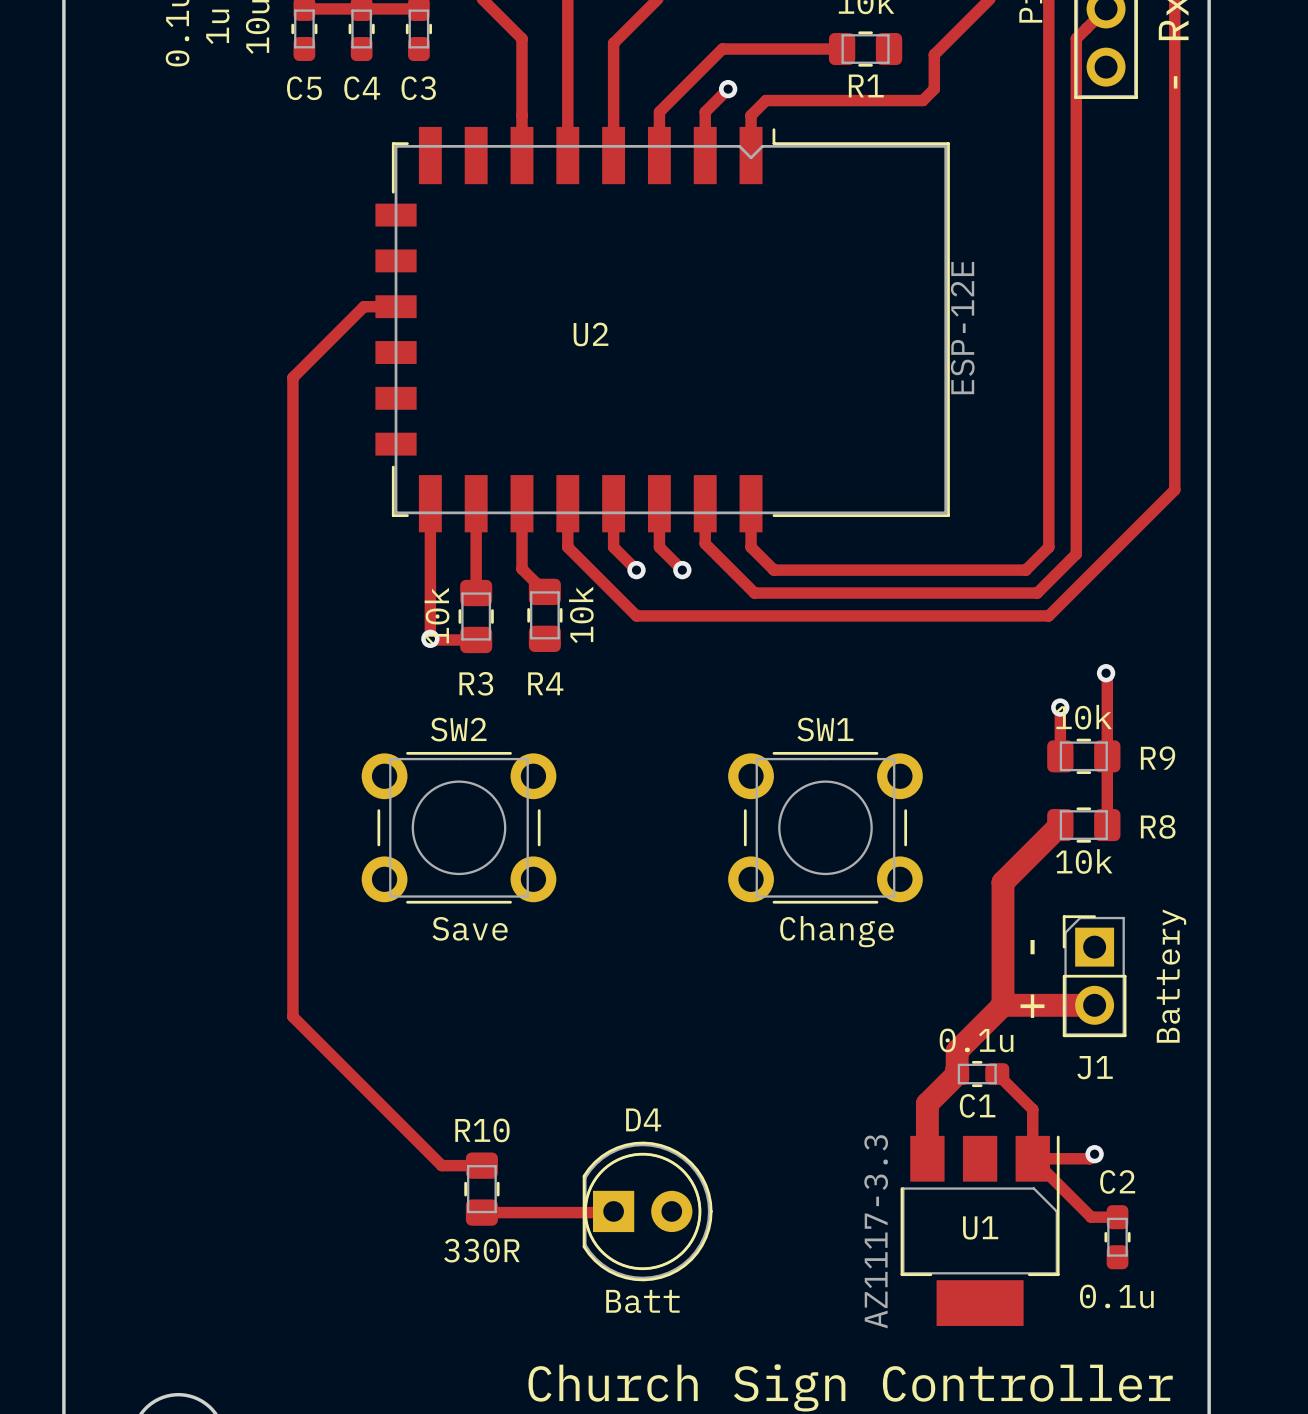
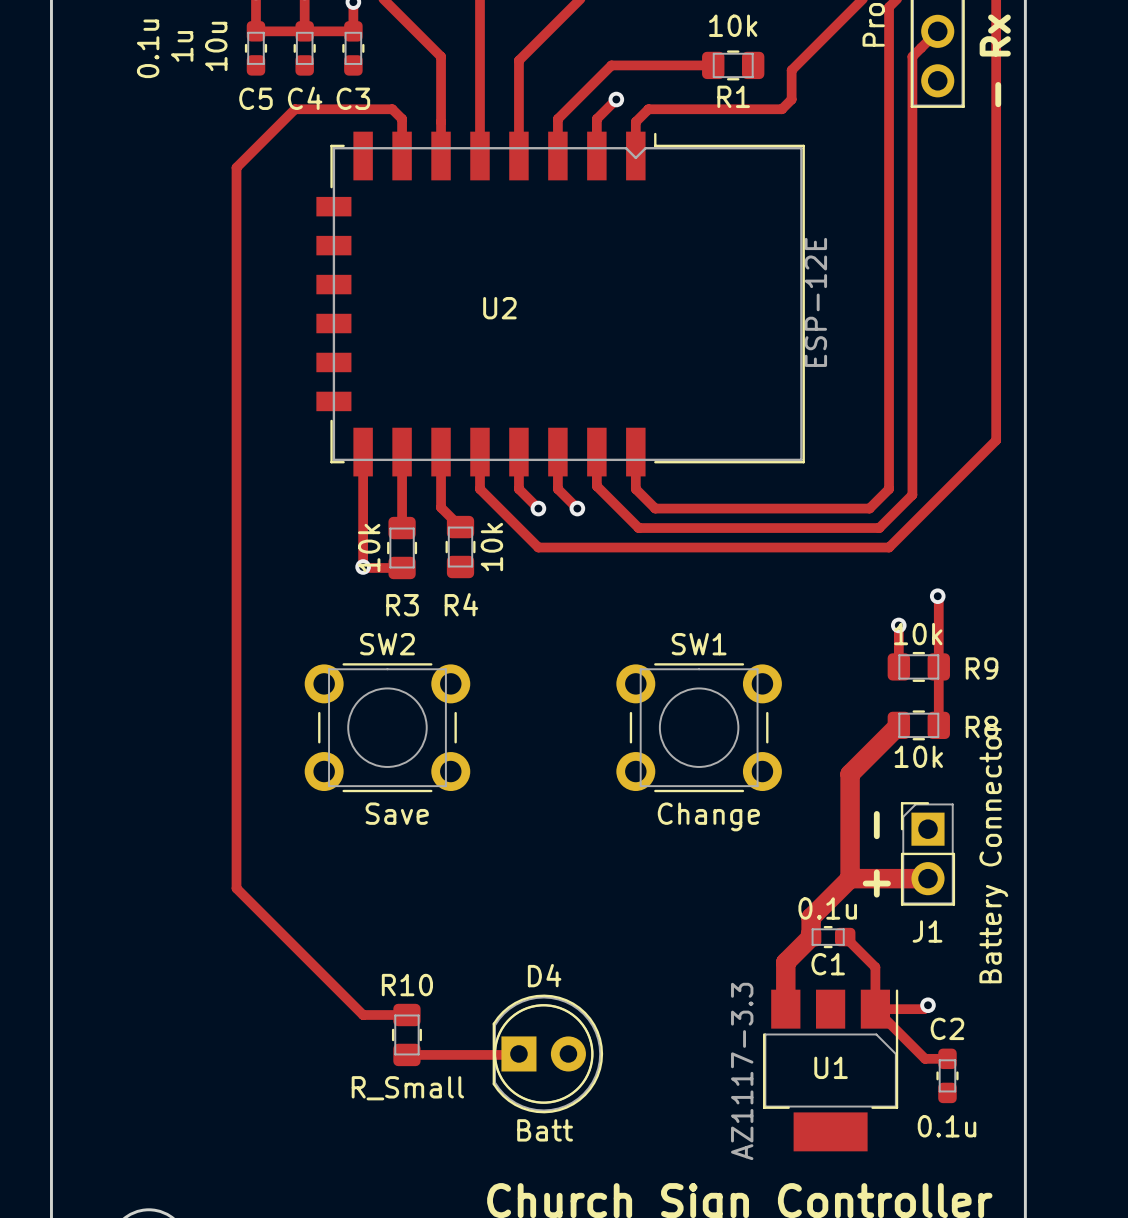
track: (396, 306) (363, 306) (292, 377) (292, 1016) (441, 1165) -> (402, 156) (402, 118) (392, 109) (294, 109) (236, 167) (236, 888) (363, 1015) (372, 1015)
J1 value: Battery (1171, 976) -> Battery Connector (993, 852)
R10 value: 330R (481, 1250) -> R_Small (407, 1088)

